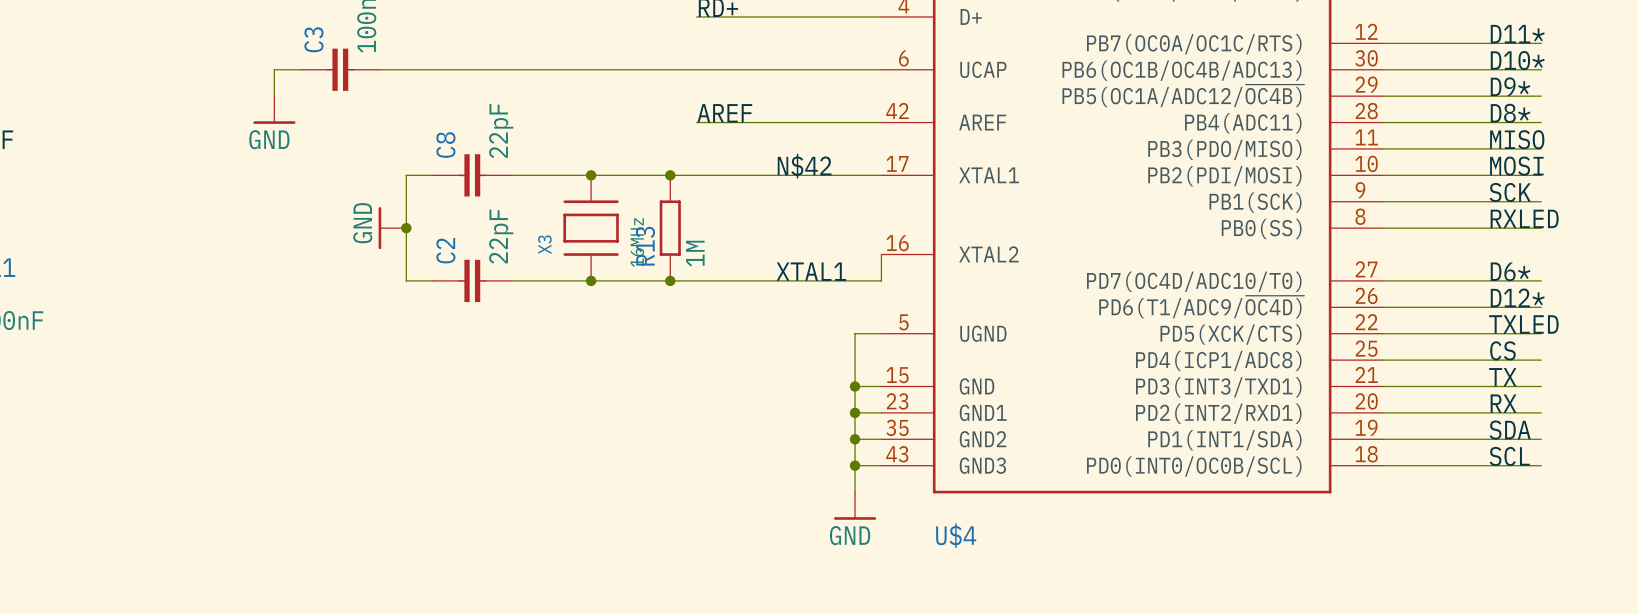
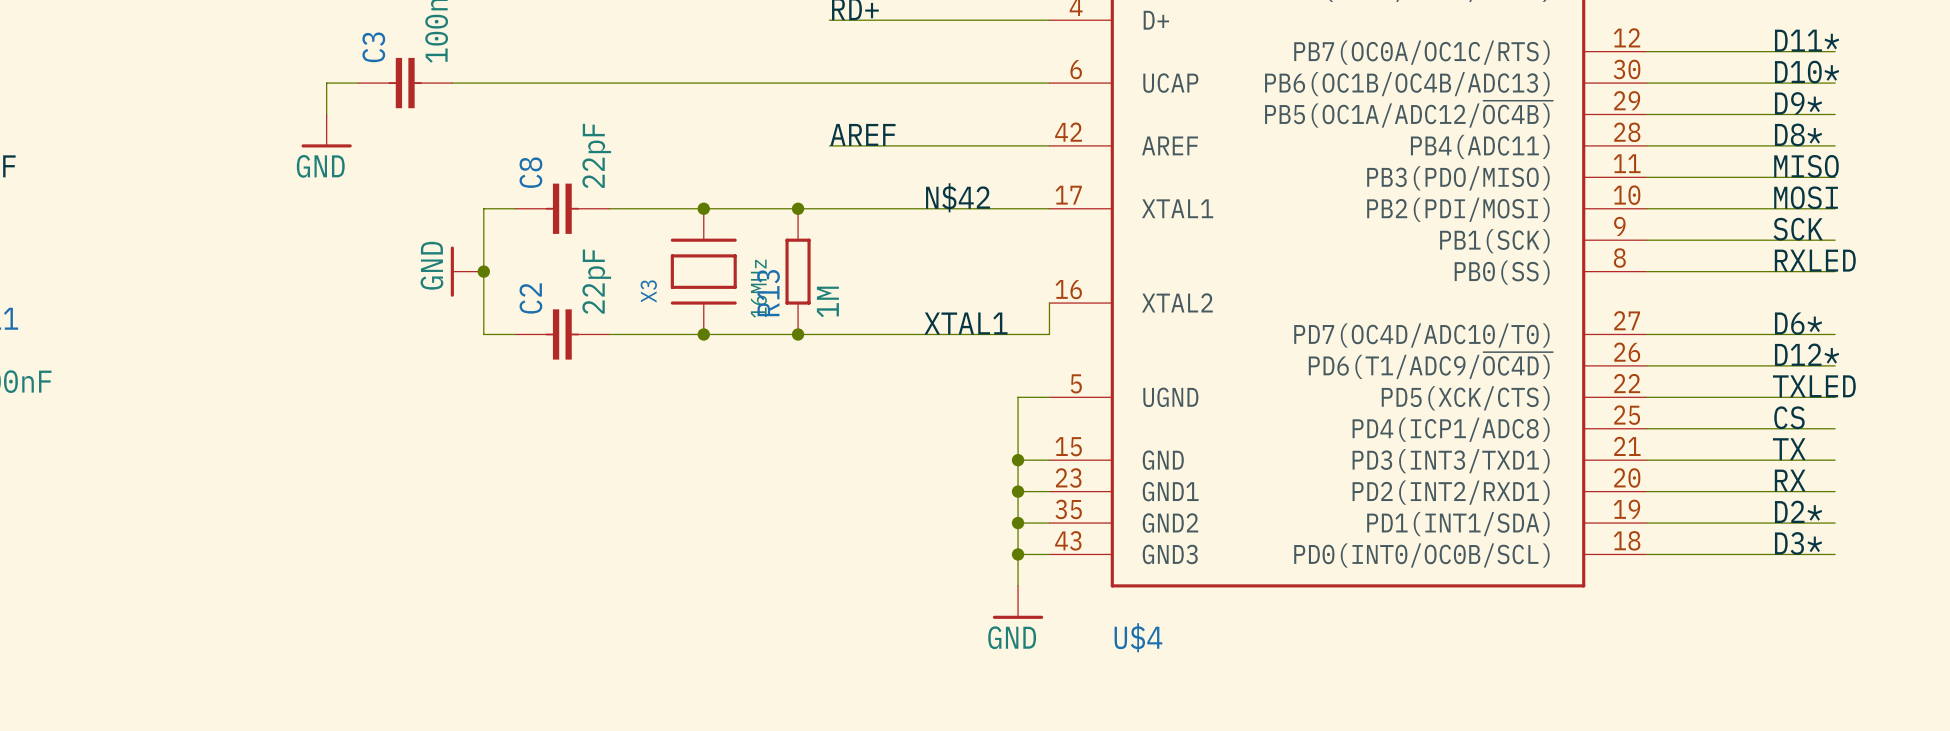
label: SDA (1510, 430) -> D2* (1798, 511)
label: SCL (1509, 456) -> D3* (1798, 543)

